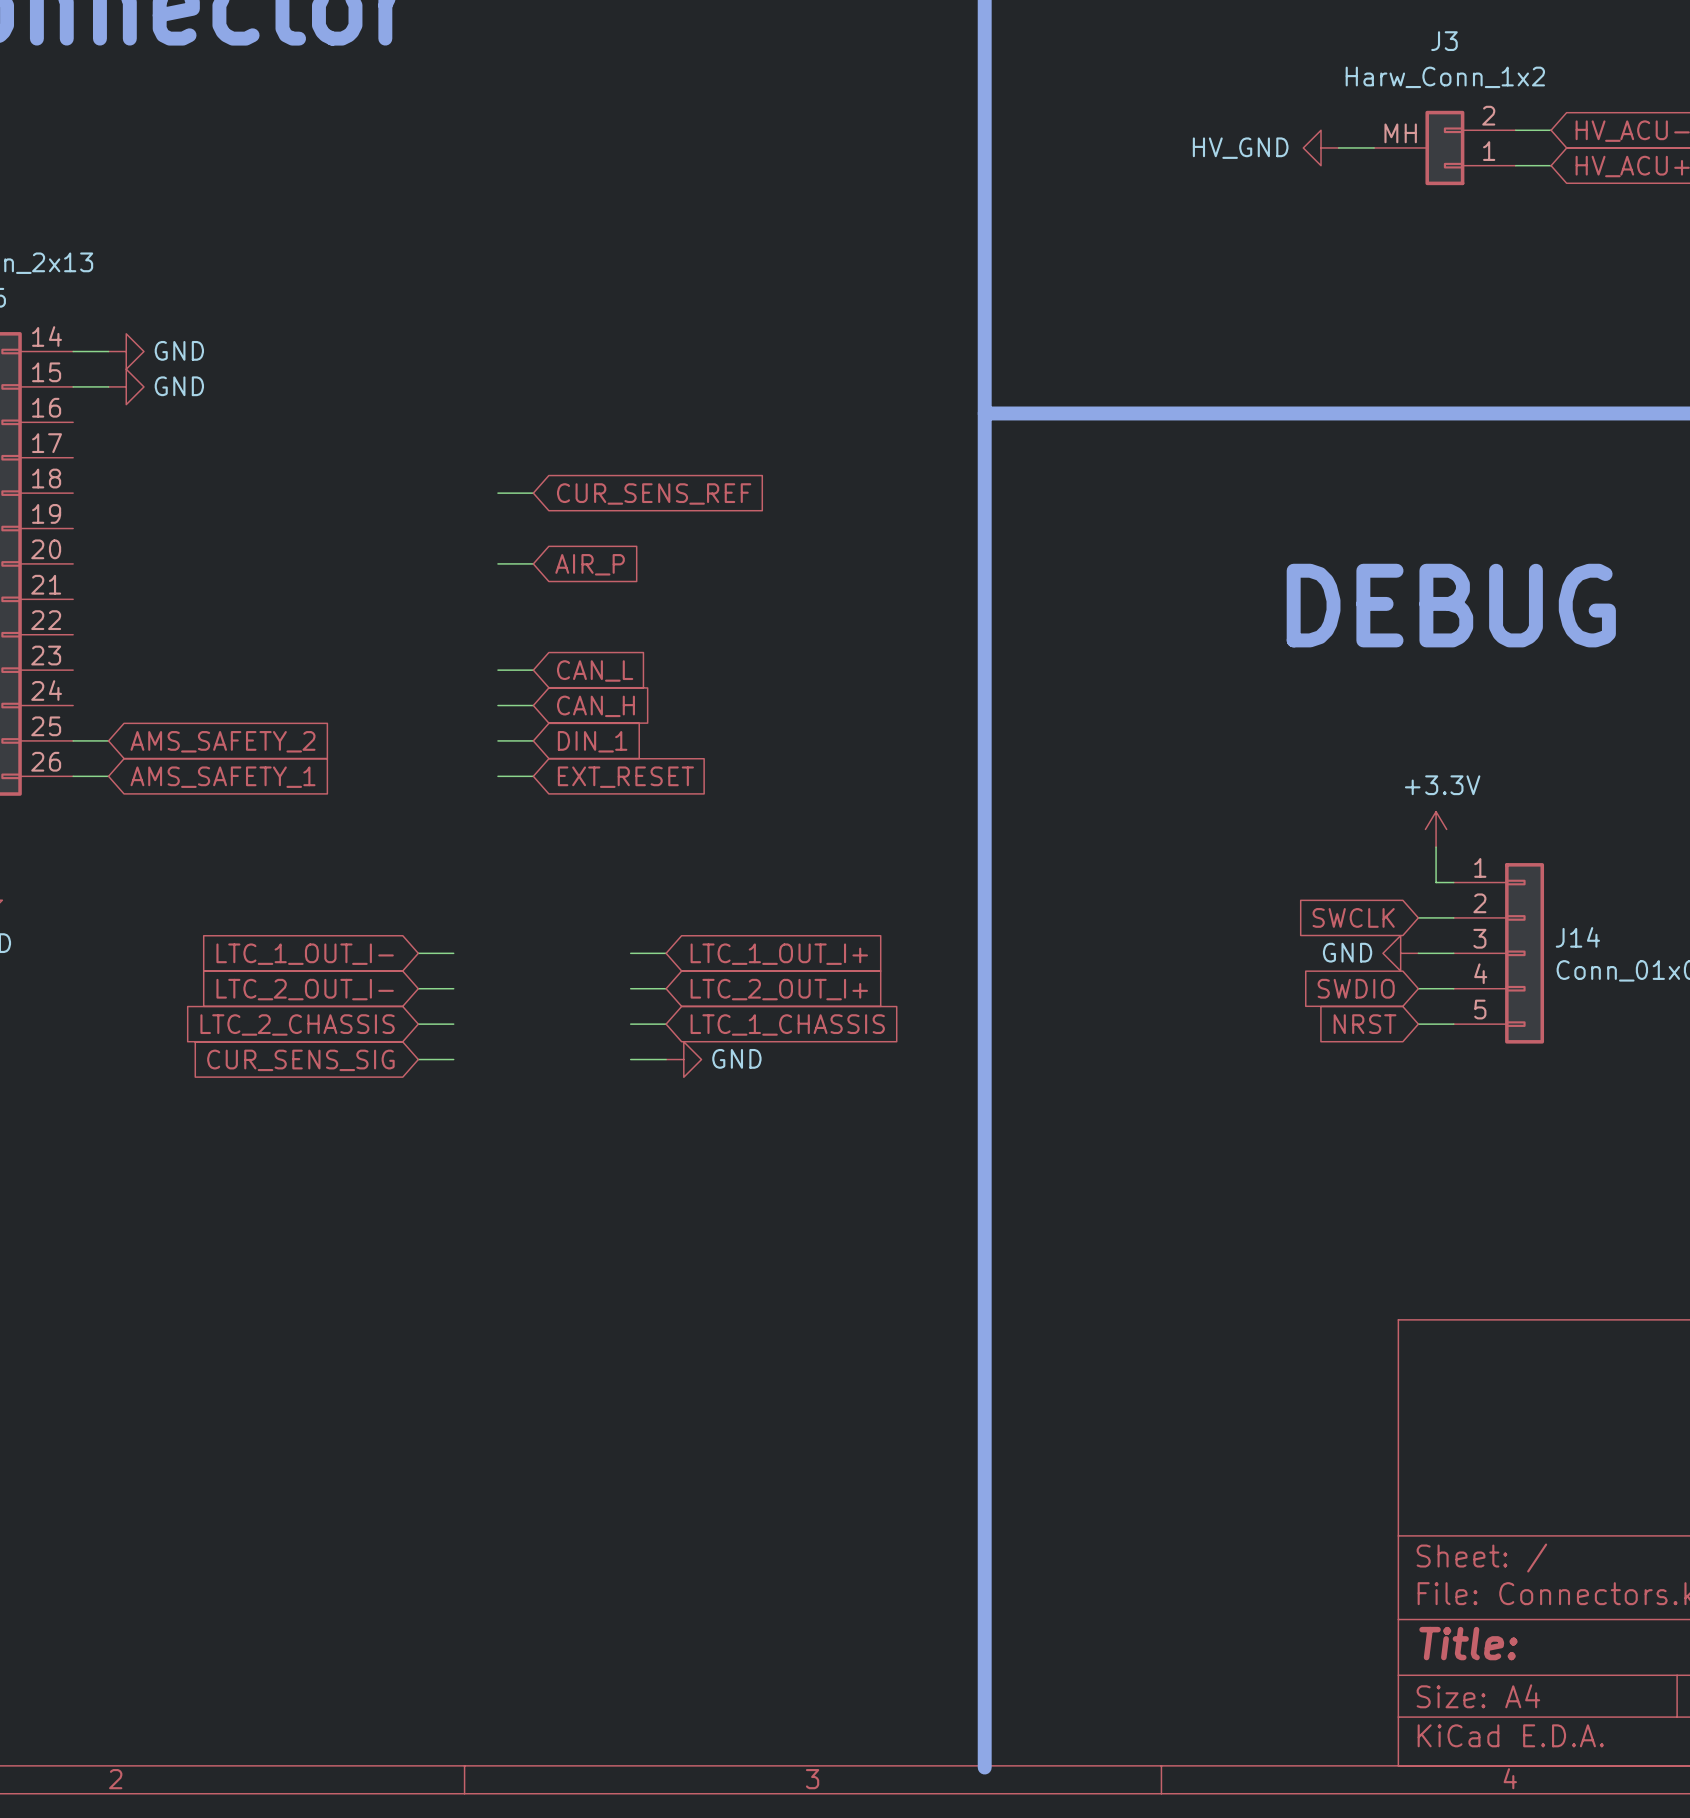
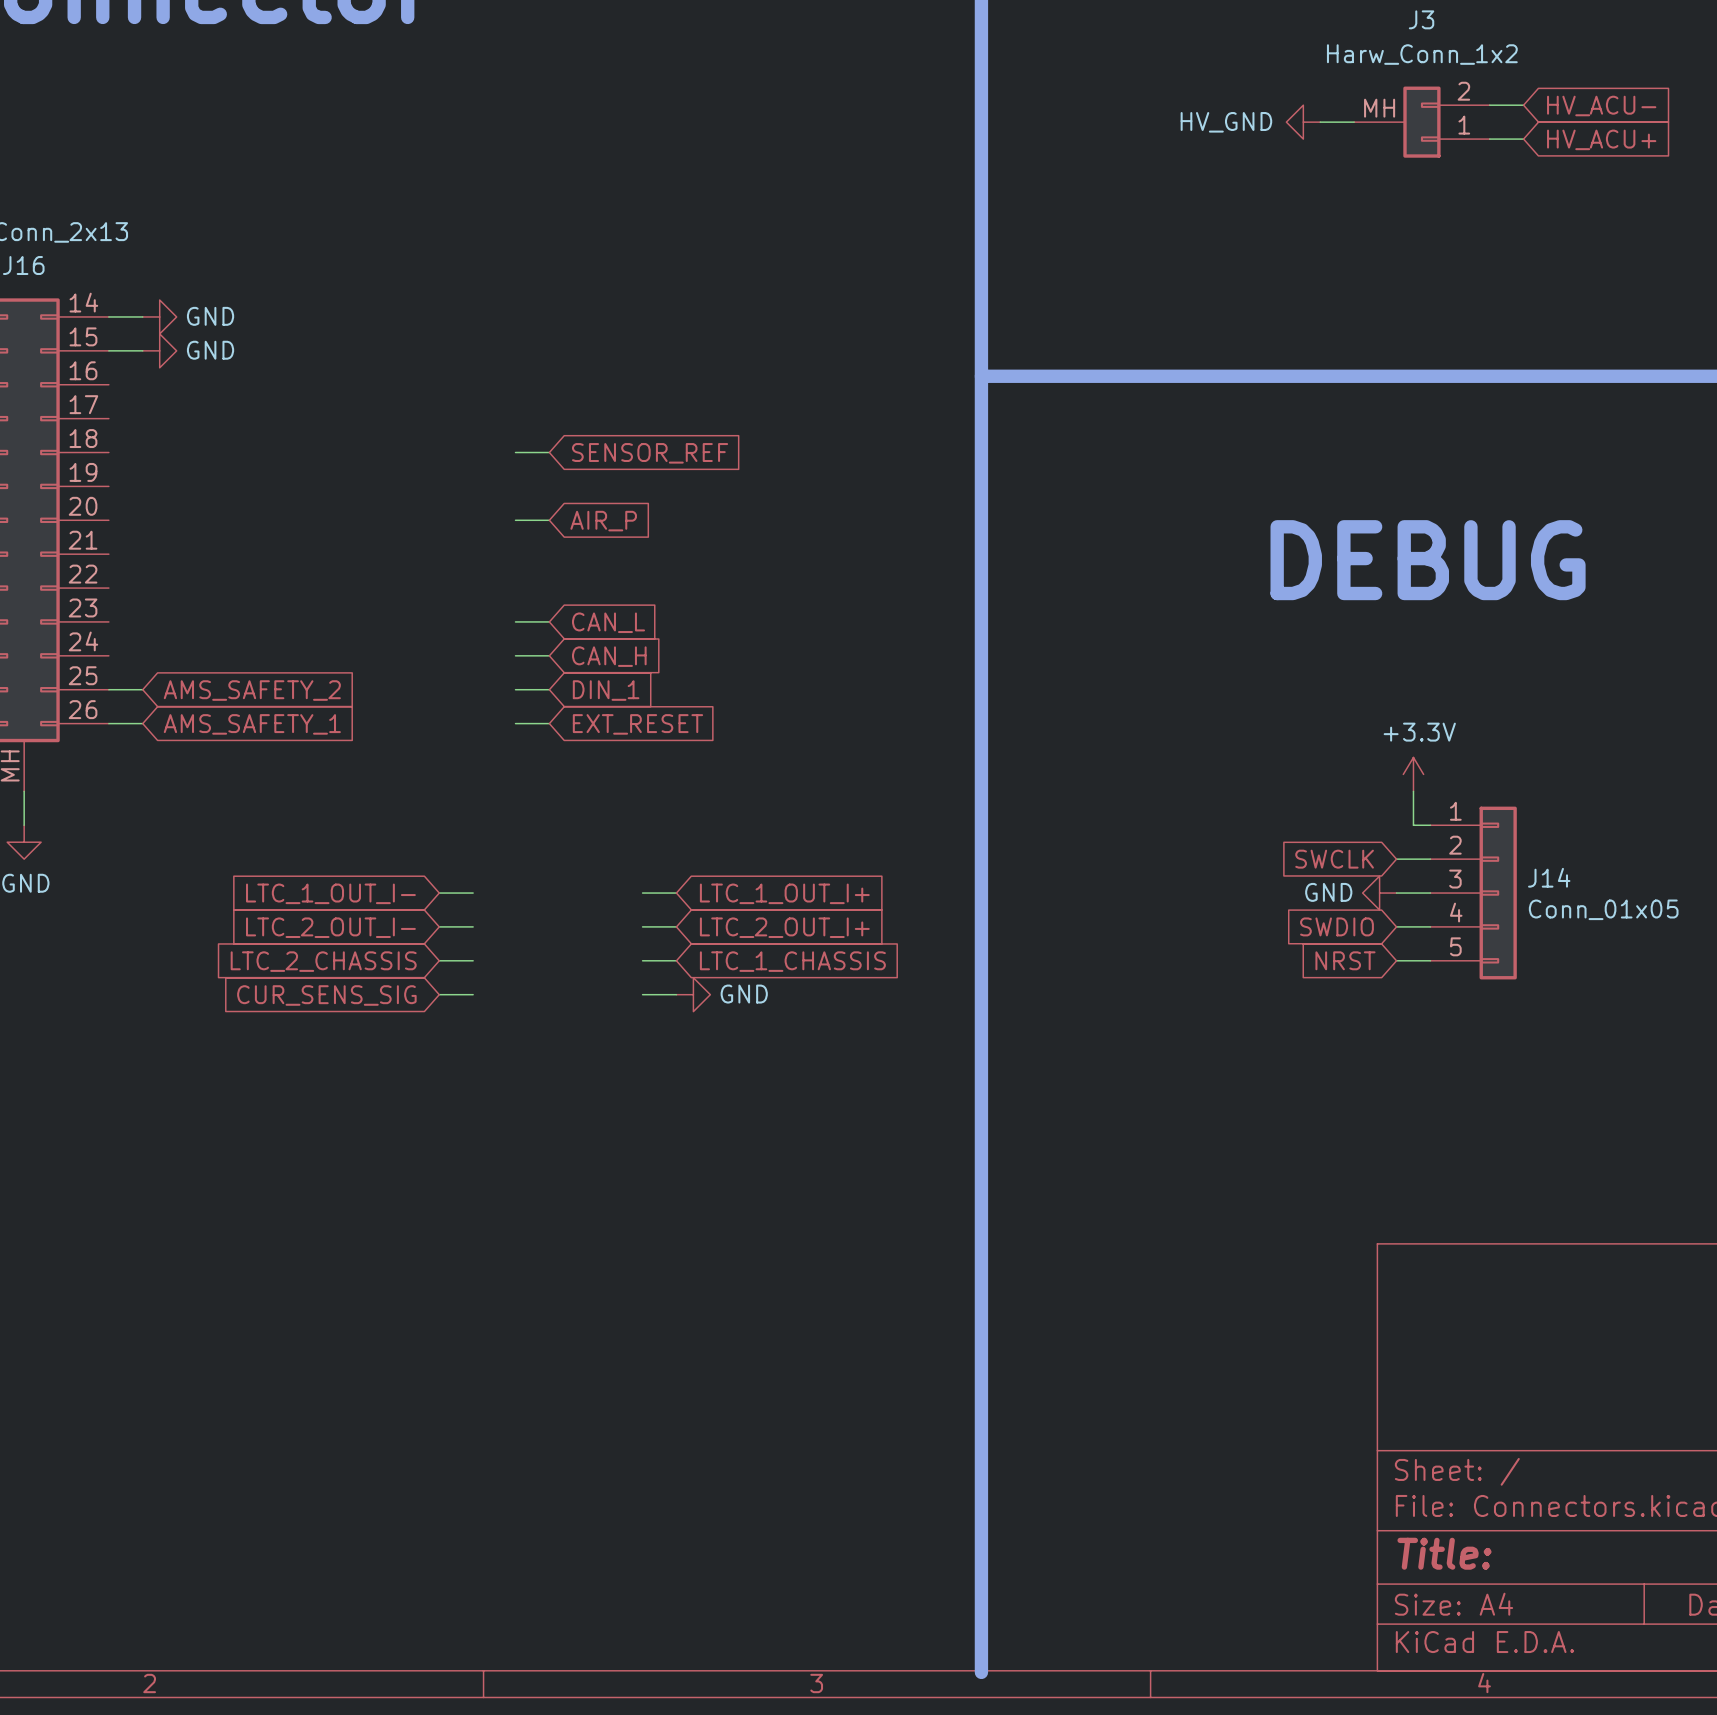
global label: CUR_SENS_REF (654, 493) -> SENSOR_REF (650, 453)

